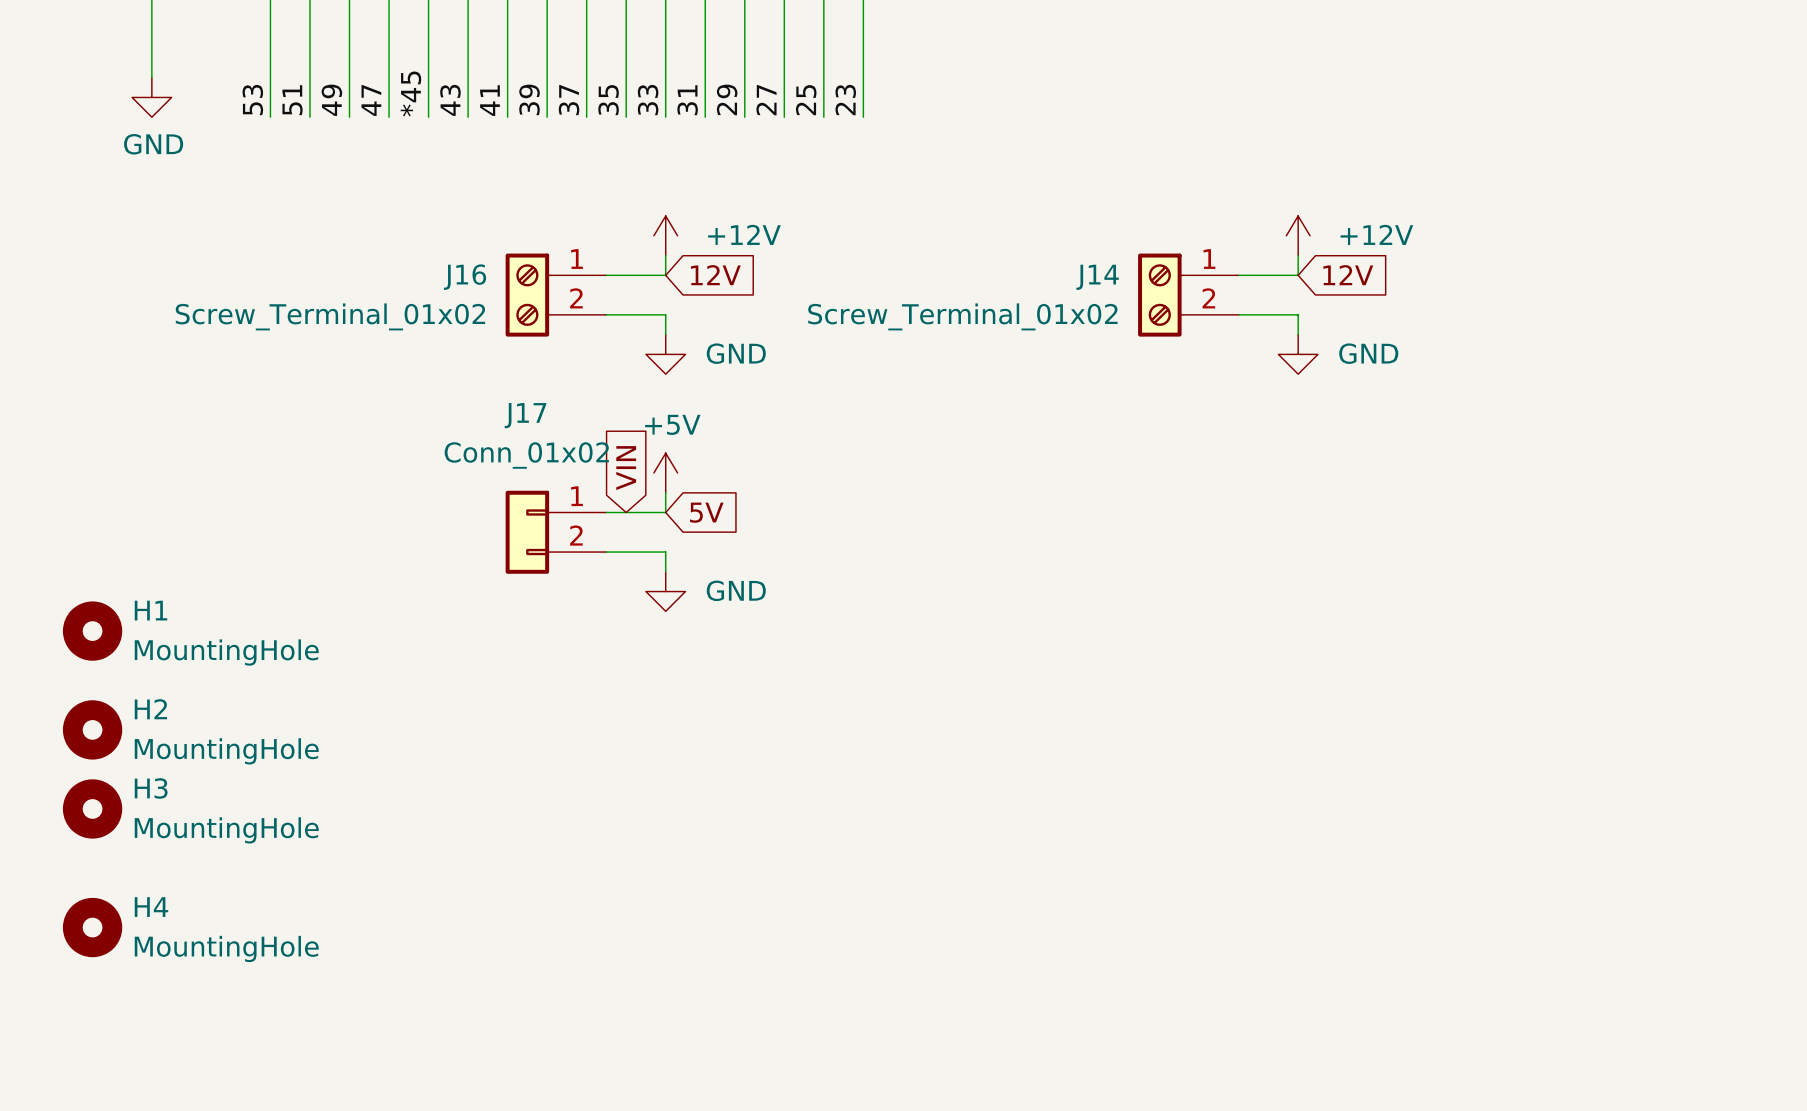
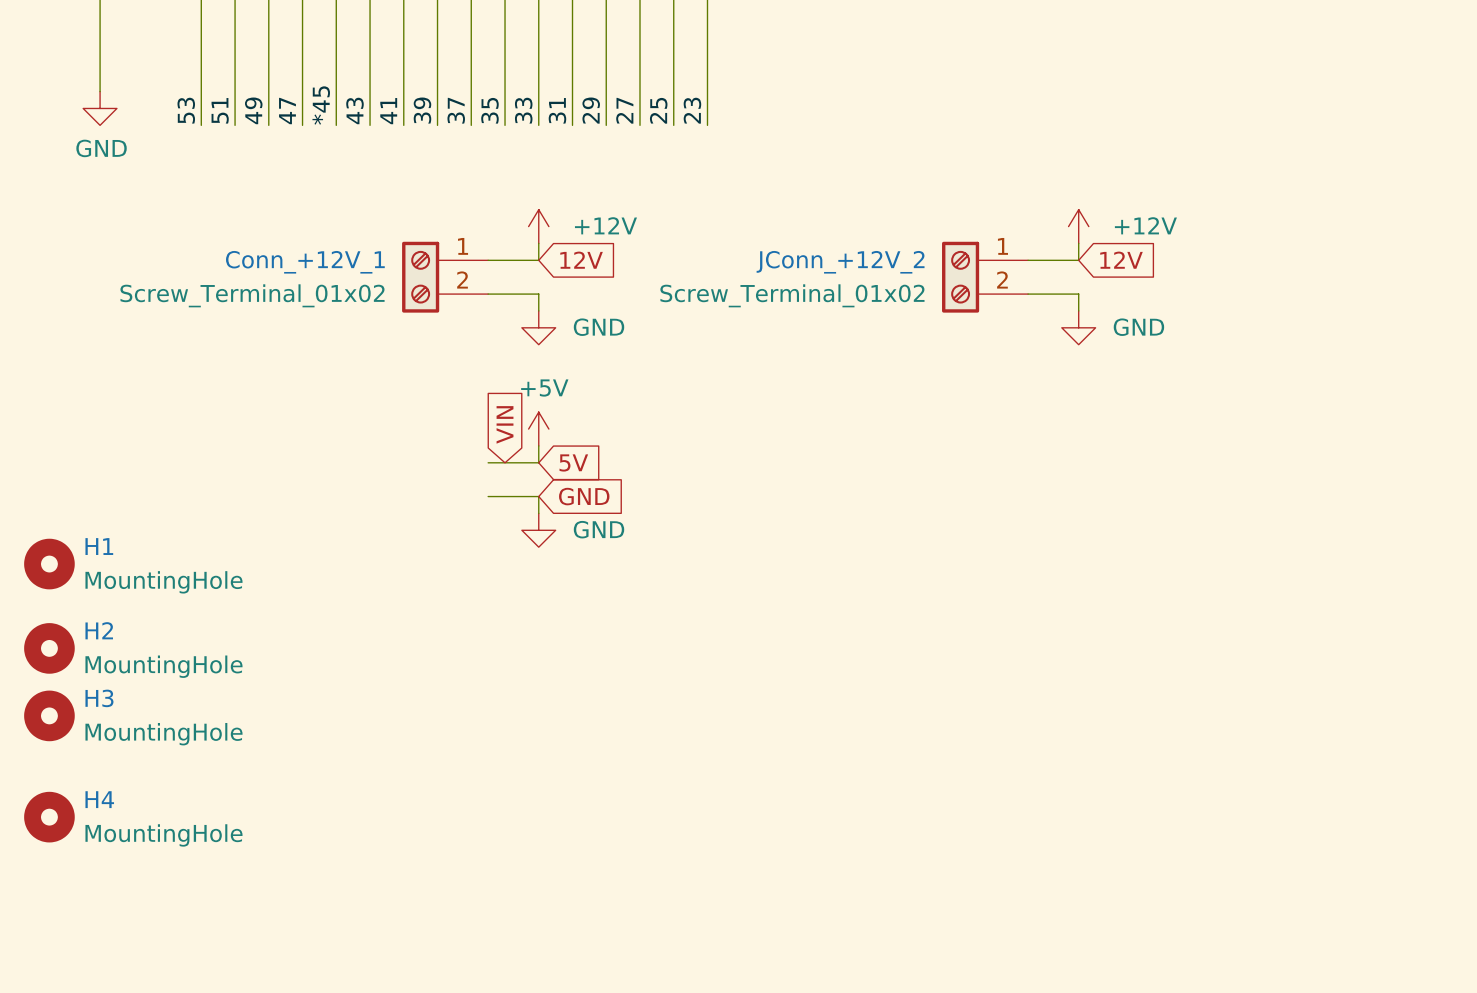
J16 name: J16 (465, 277) -> Conn_+12V_1 (305, 262)
J14 name: J14 (1097, 277) -> JConn_+12V_2 (840, 262)
J17: Conn_01x02 (556, 532) -> none
global label: none -> GND (584, 496)

